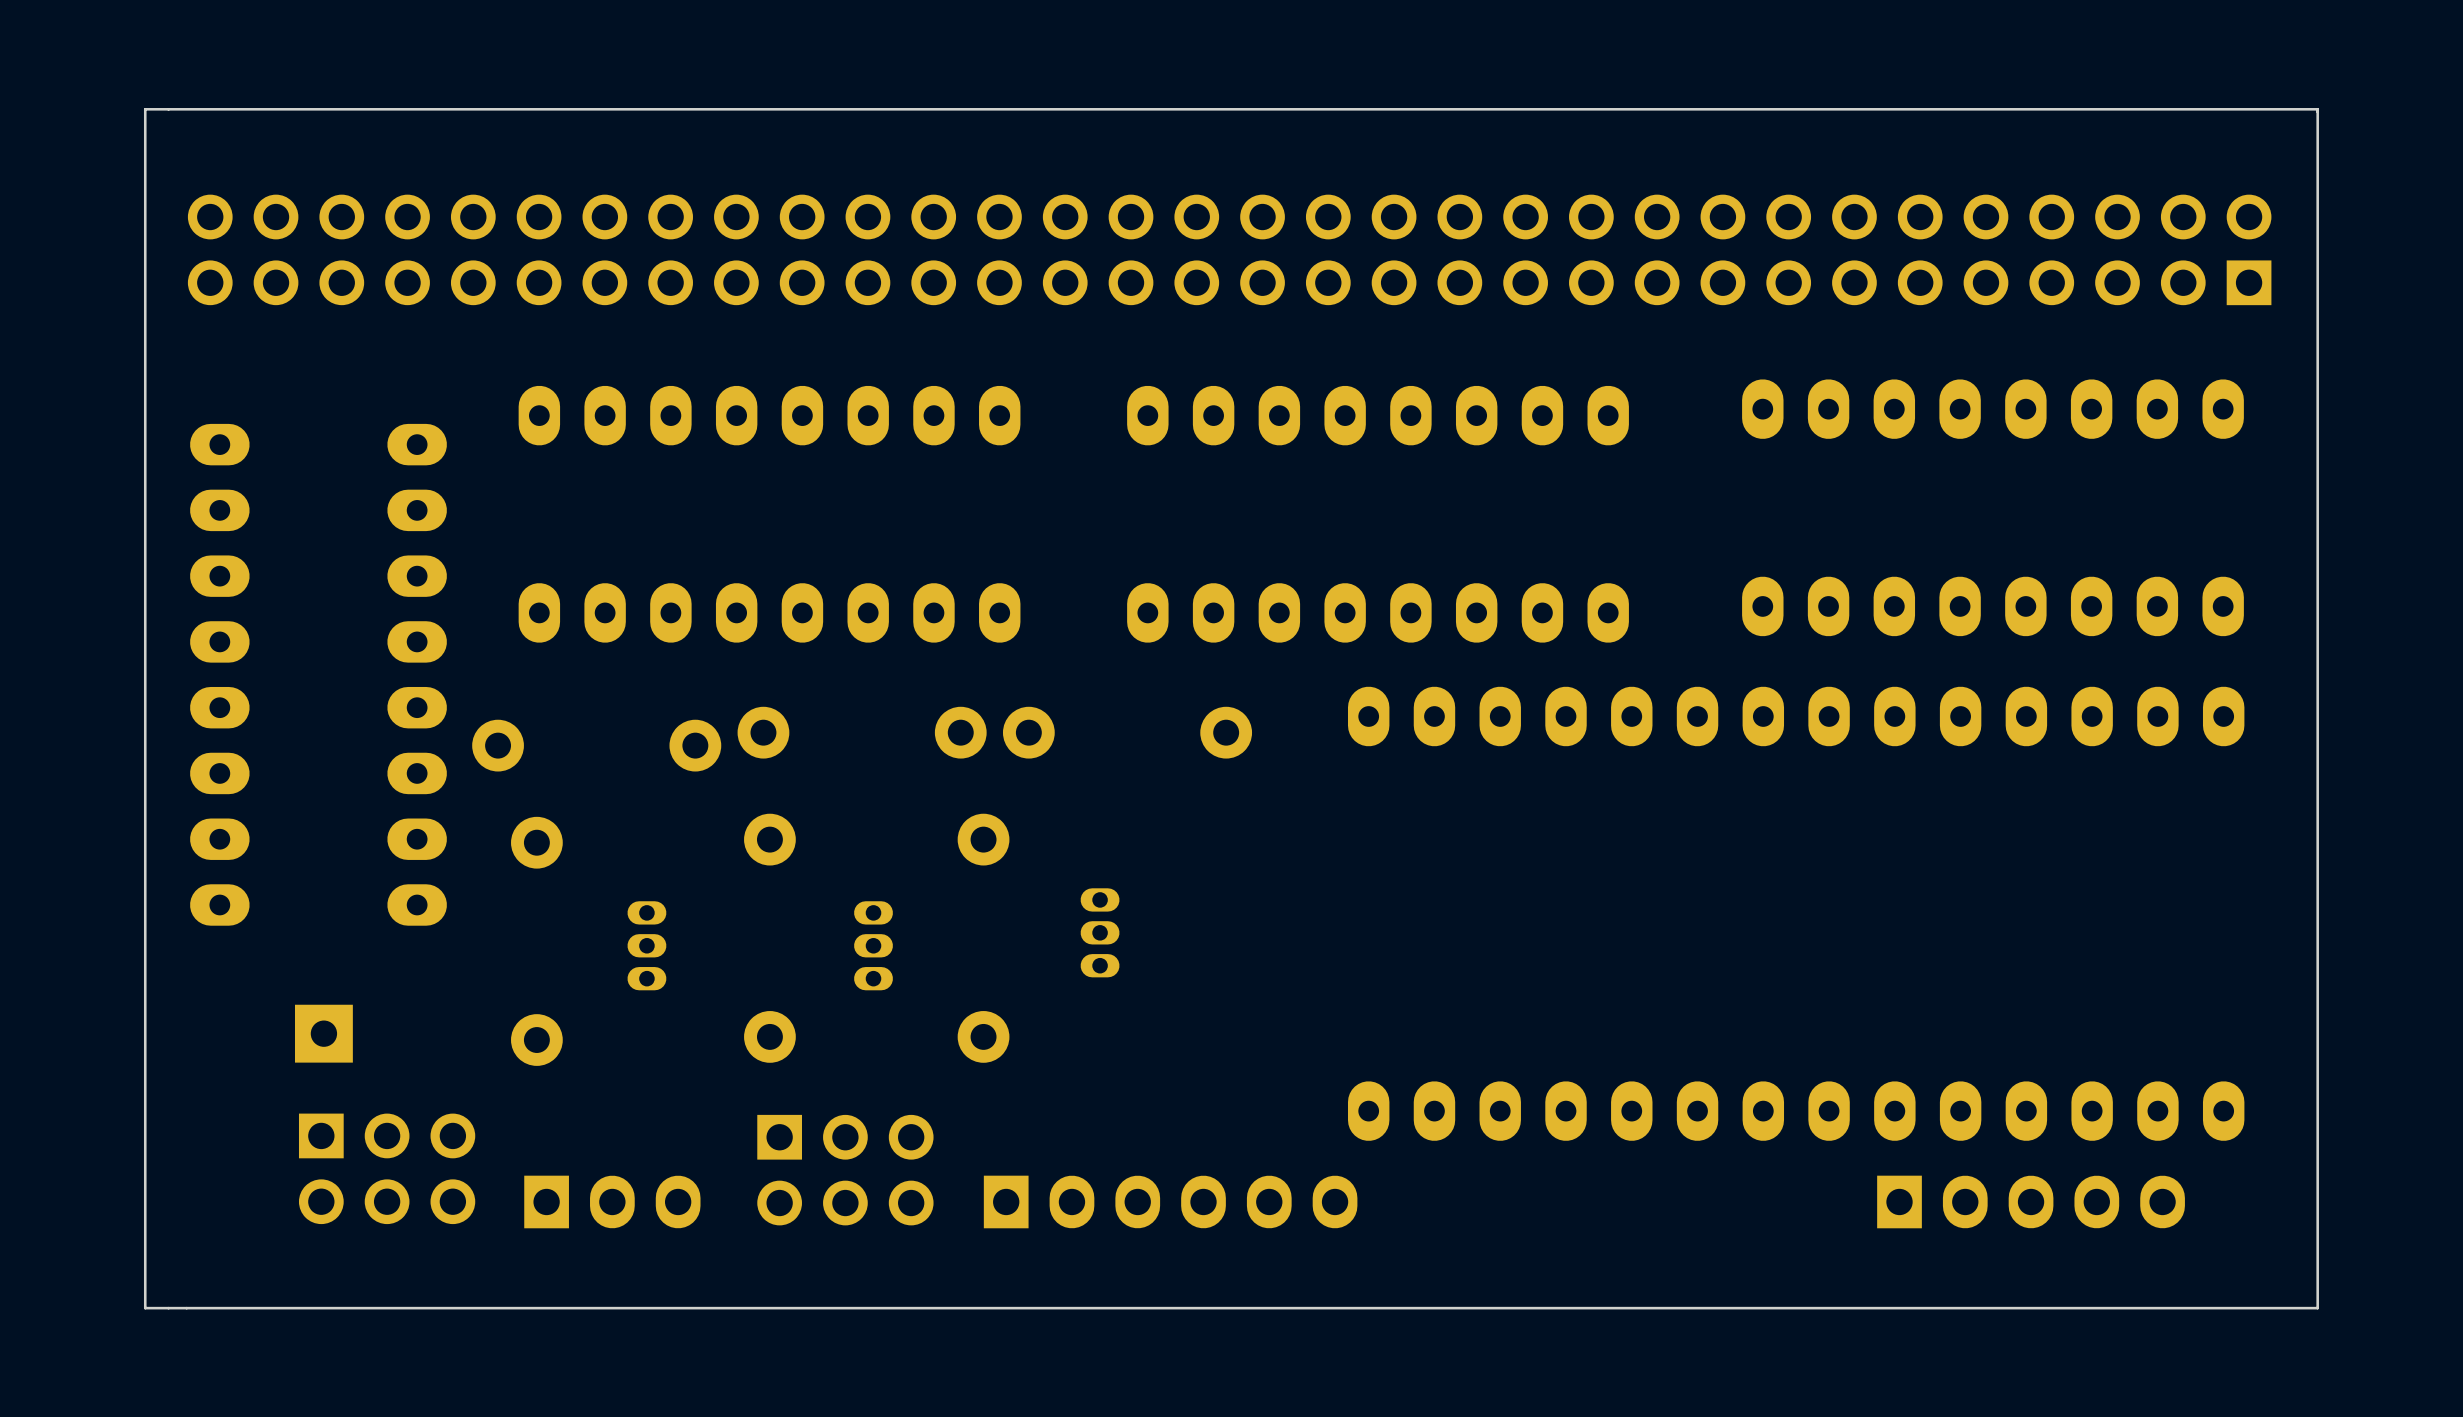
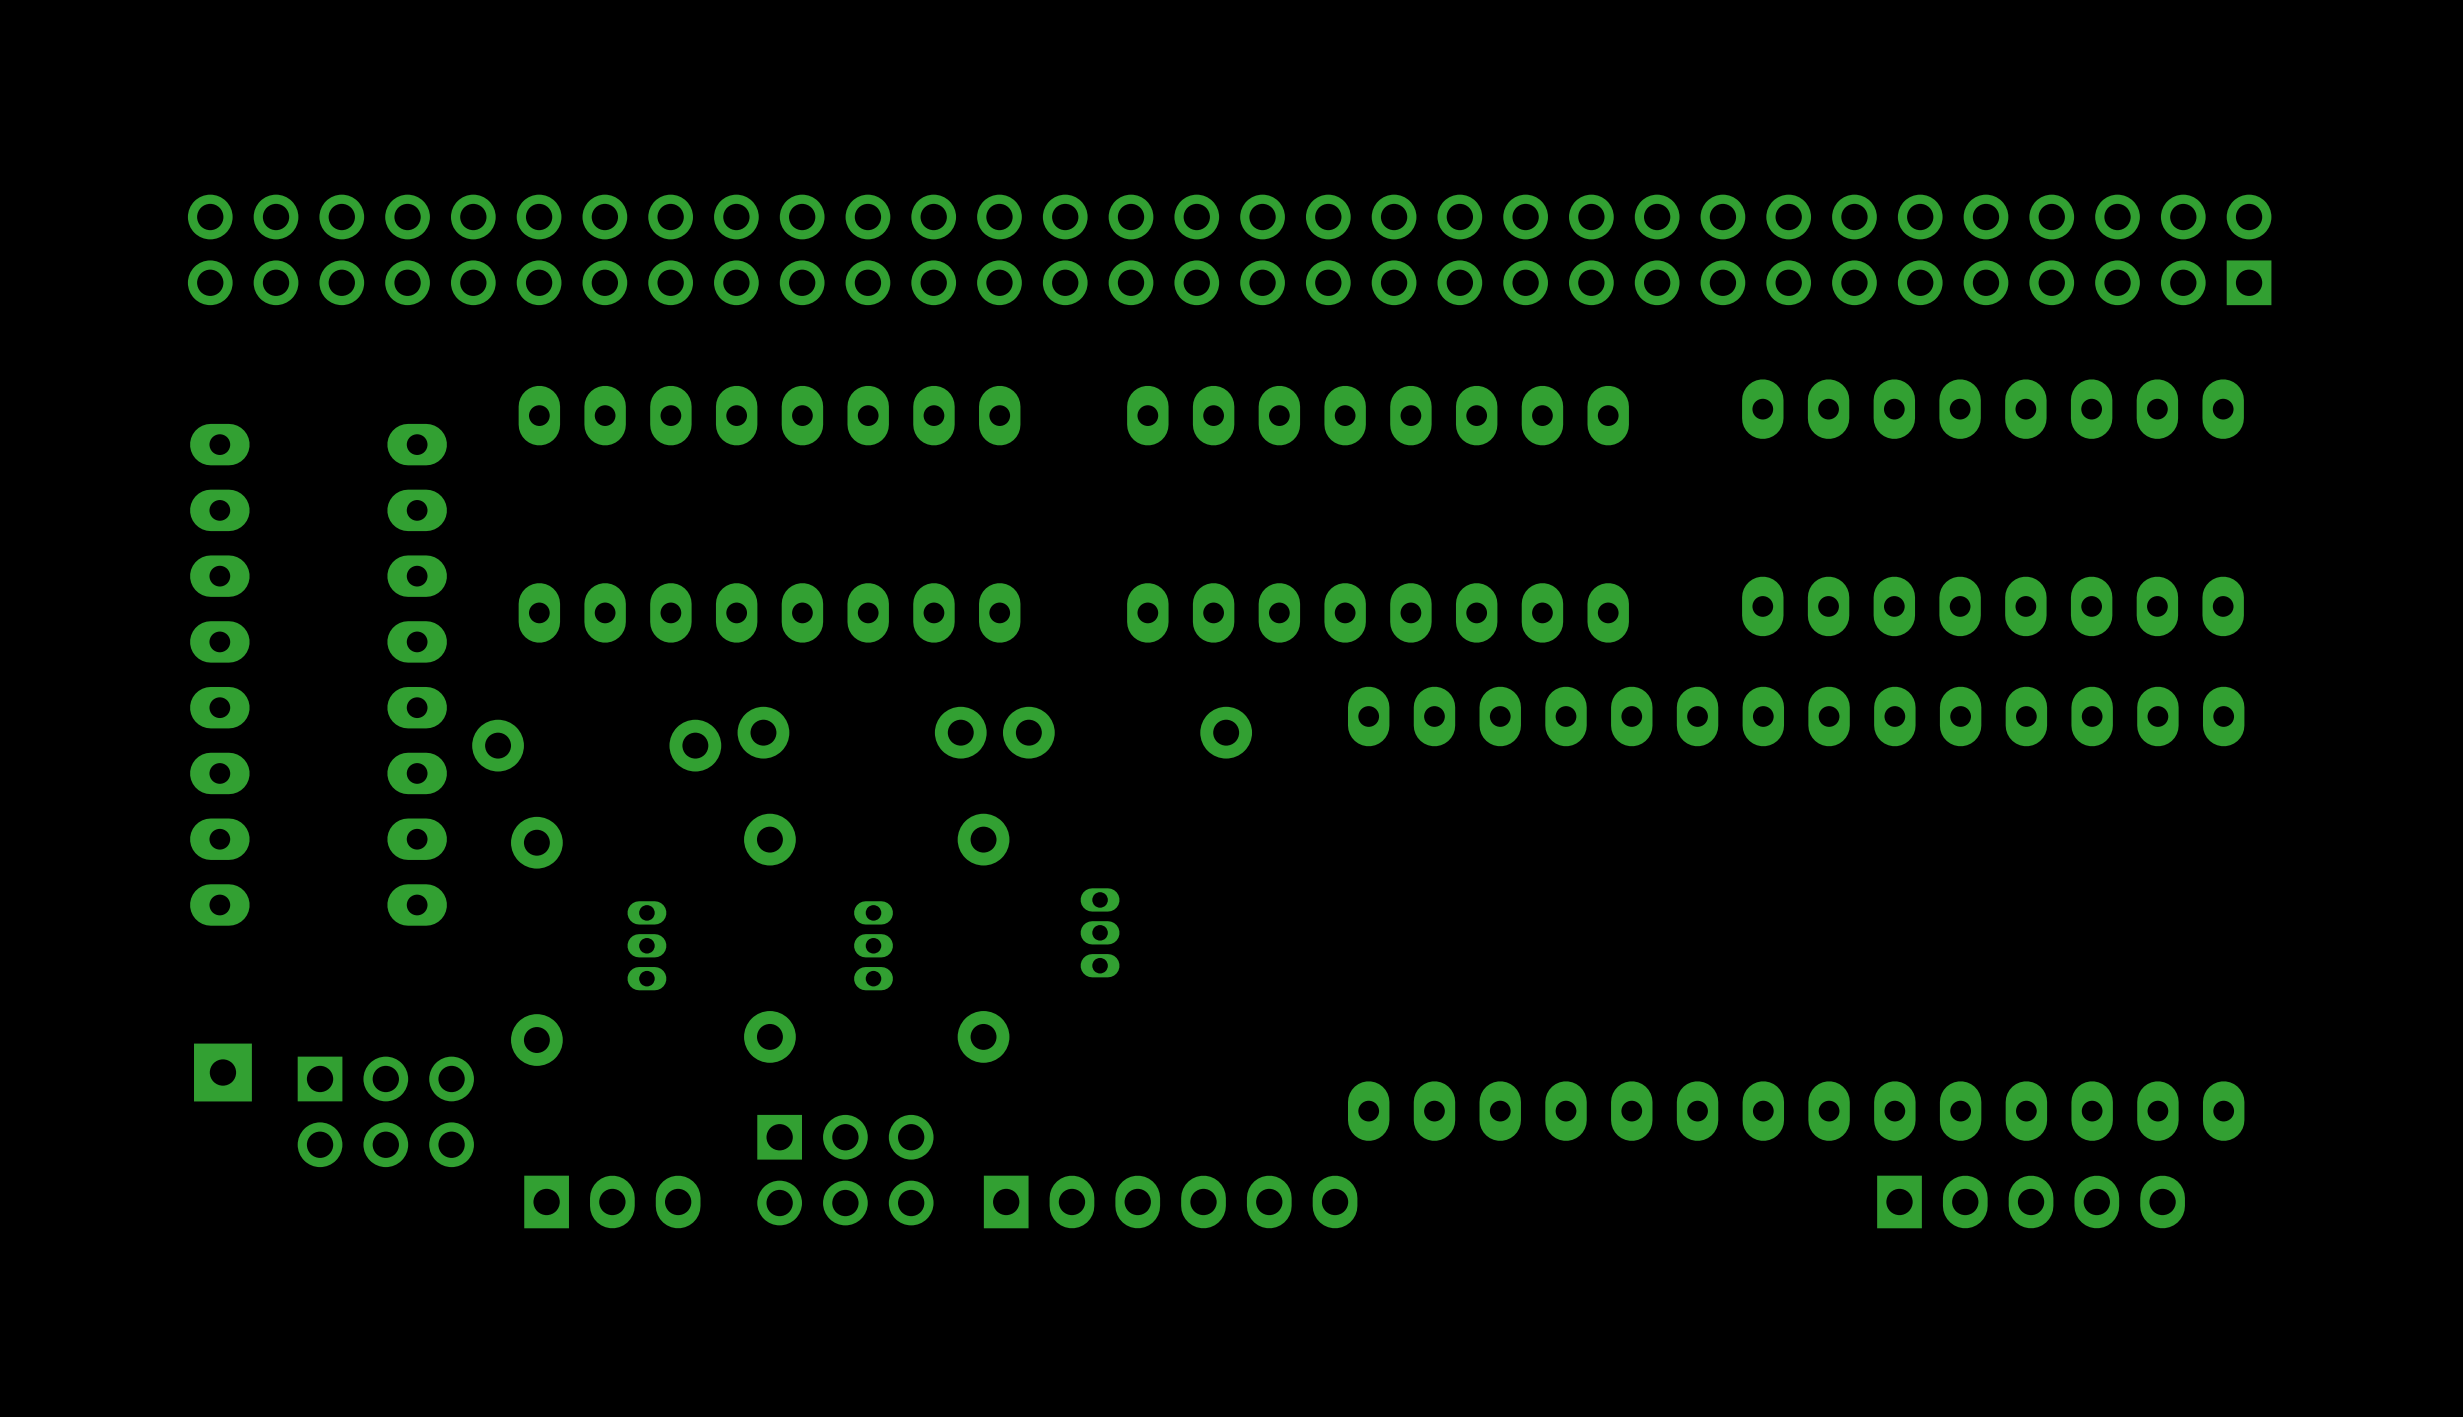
board edge: (2317, 109) (145, 109) (145, 1308) (2317, 1308) (2317, 109) -> none
part position: (323, 1033) -> (222, 1072)
part position: (387, 1168) -> (385, 1111)

